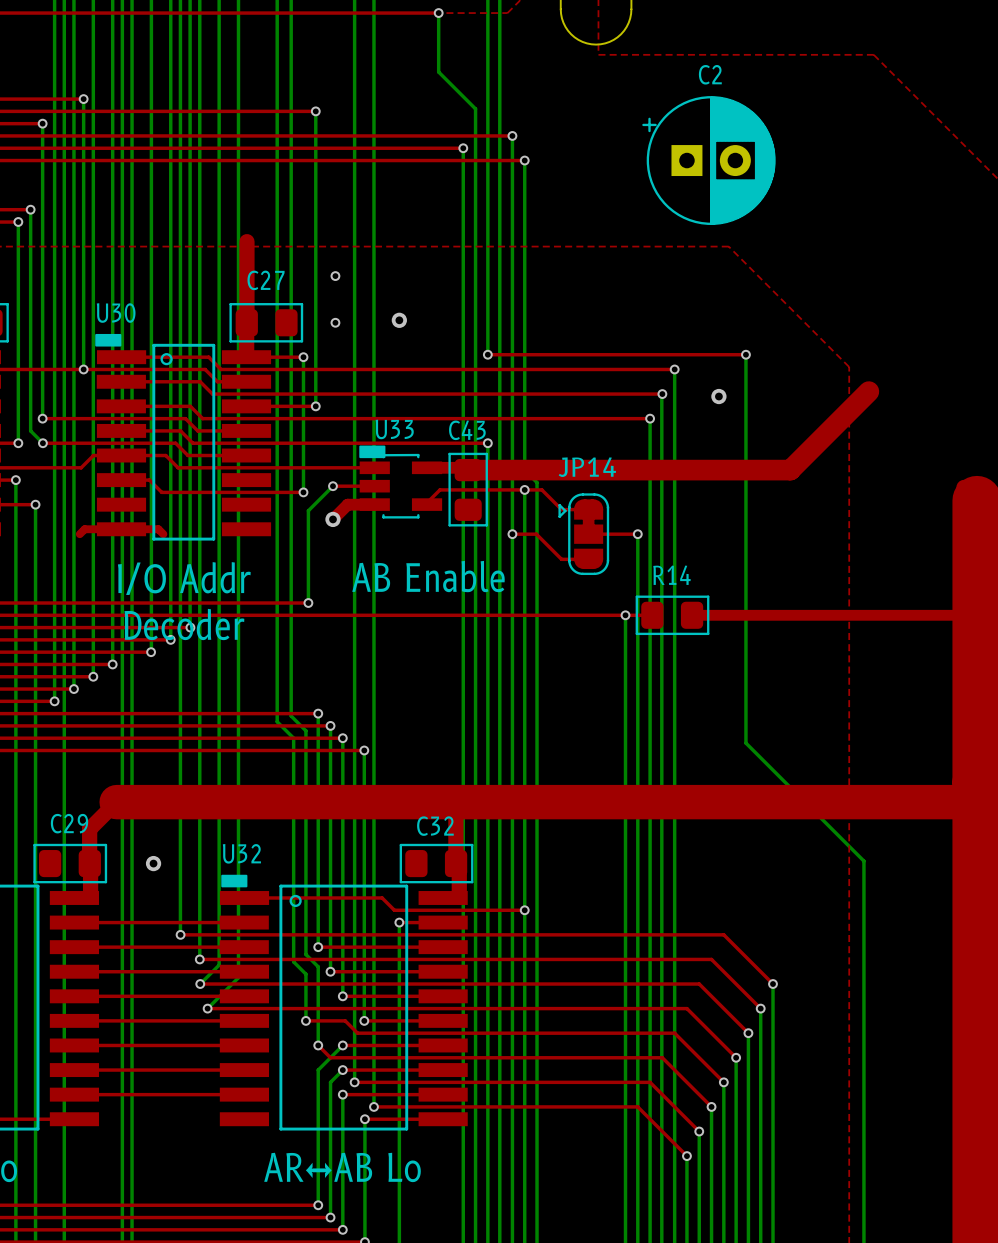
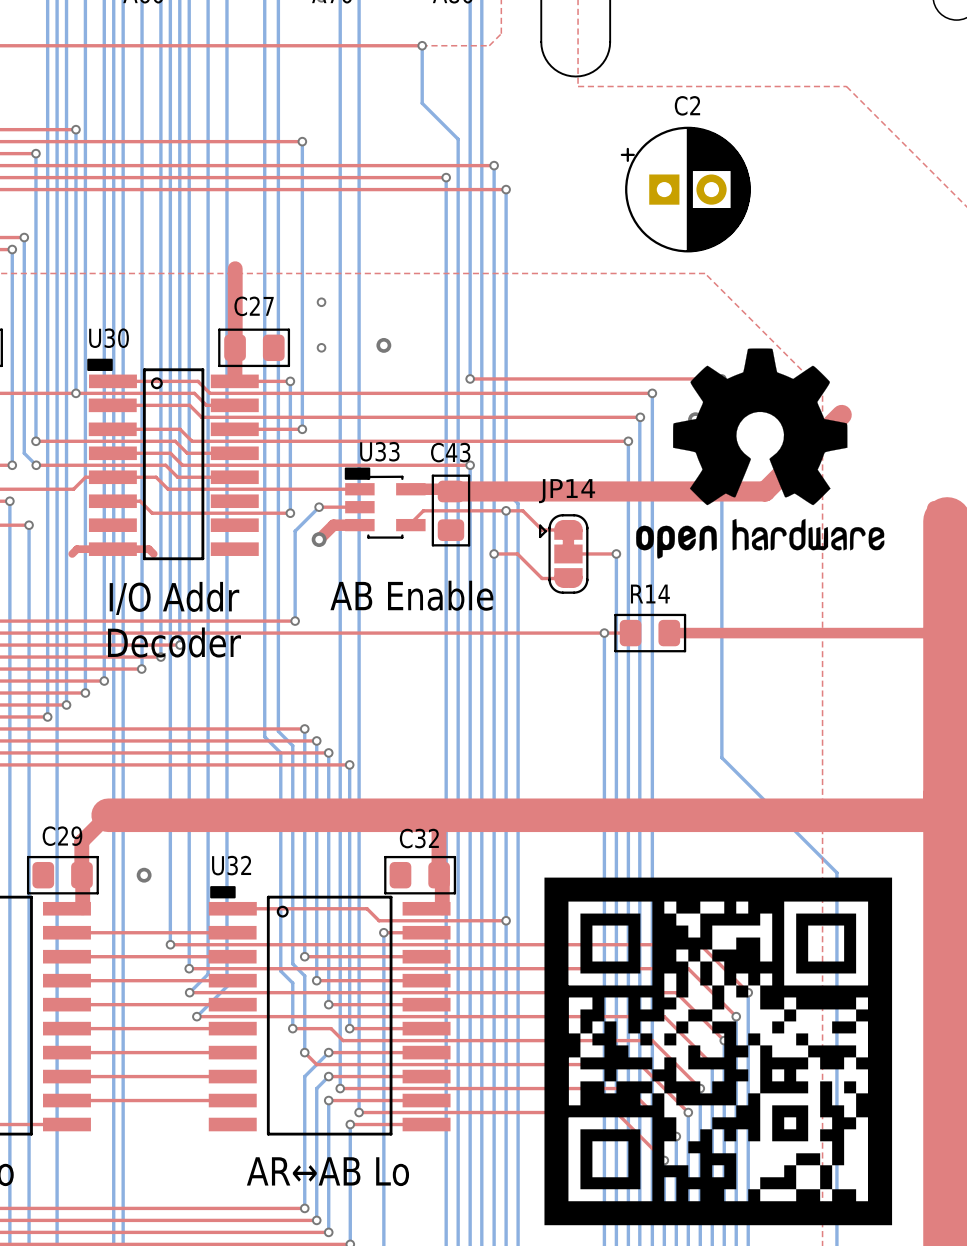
drawing: none -> [636, 348, 885, 559]
drawing: none -> [544, 877, 893, 1226]

